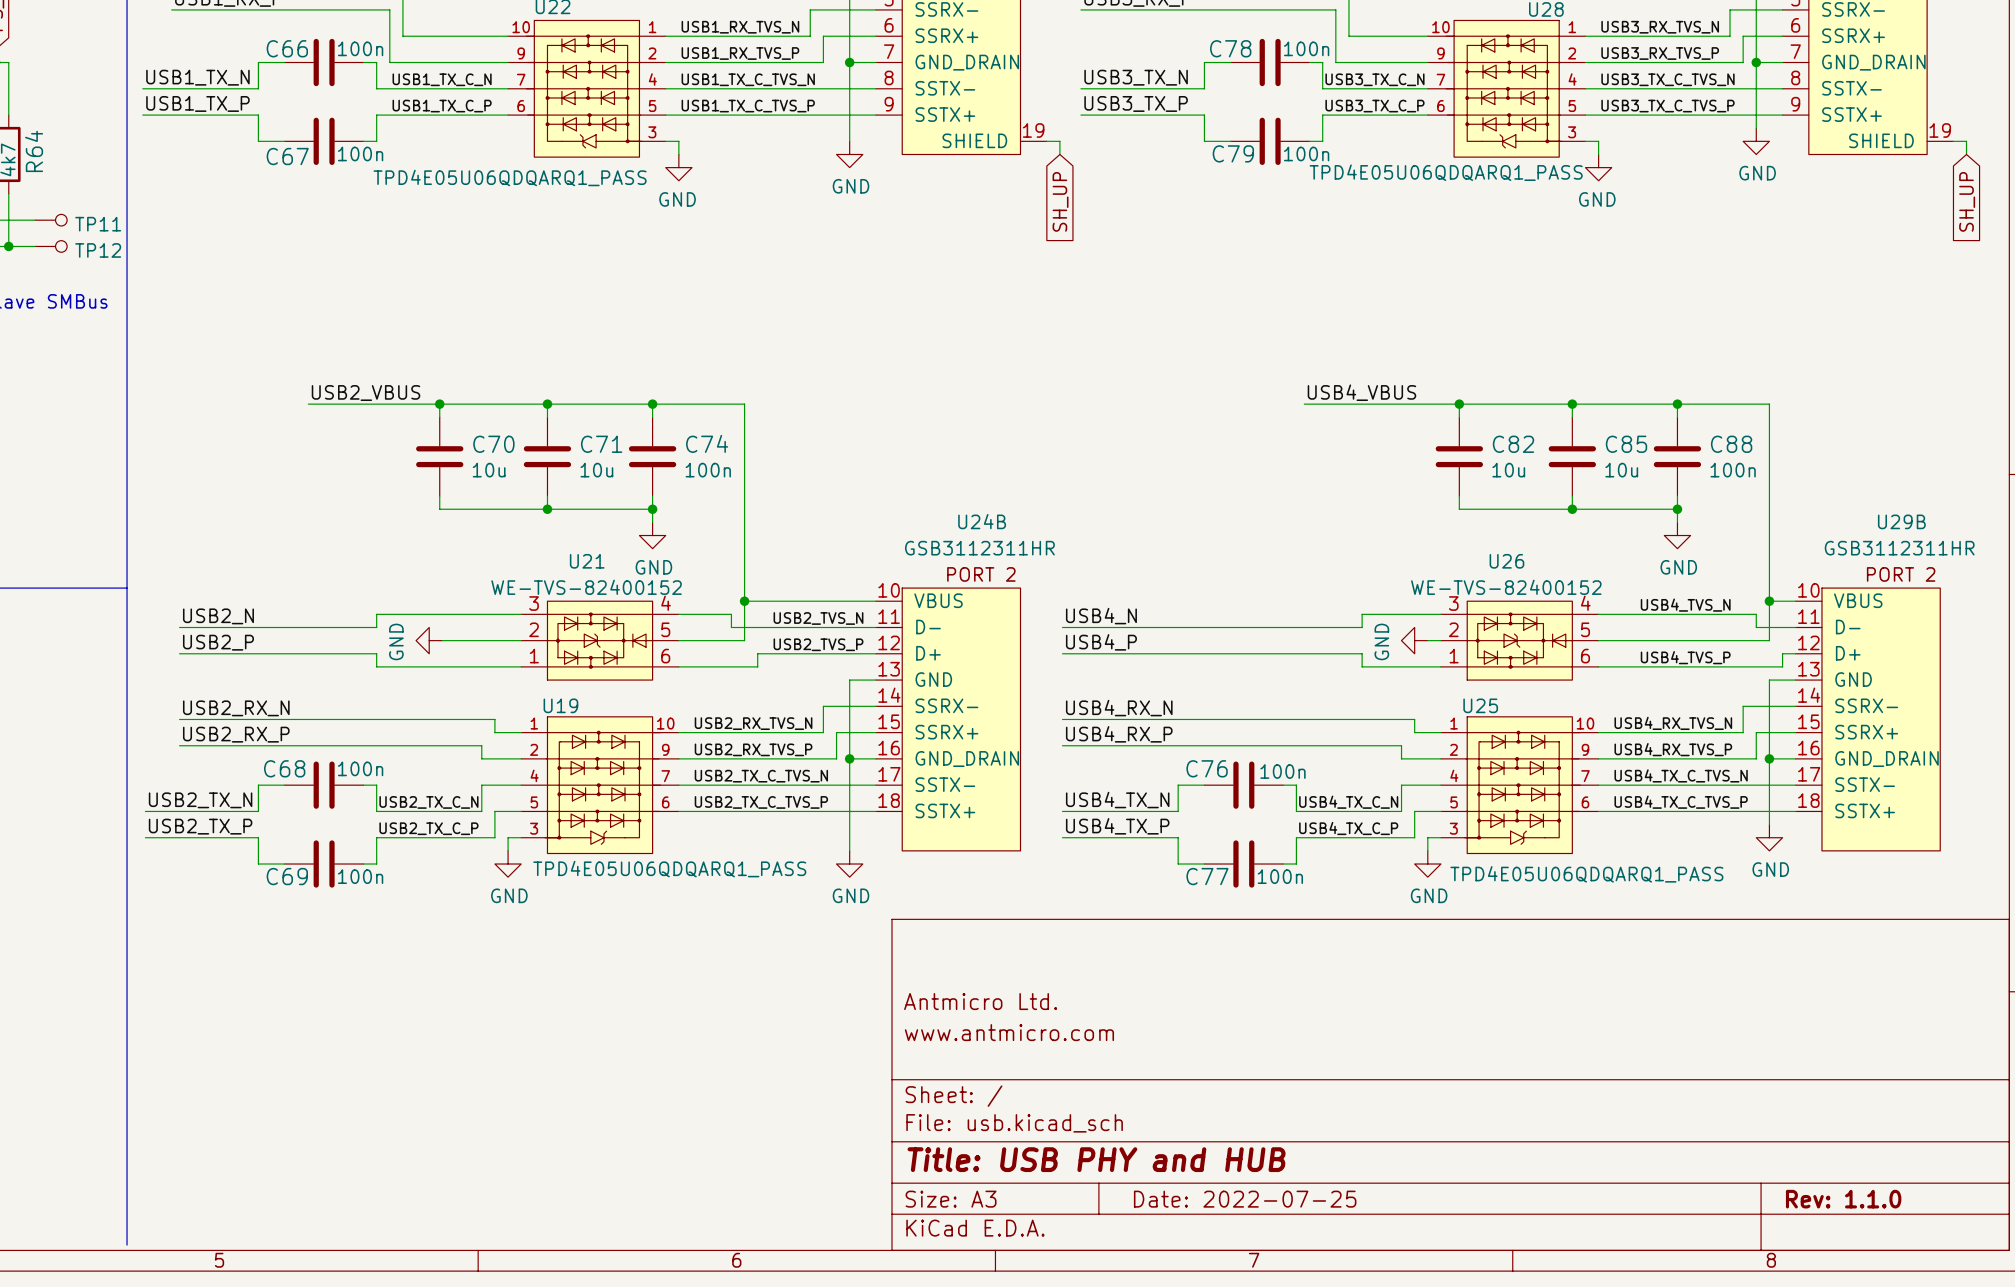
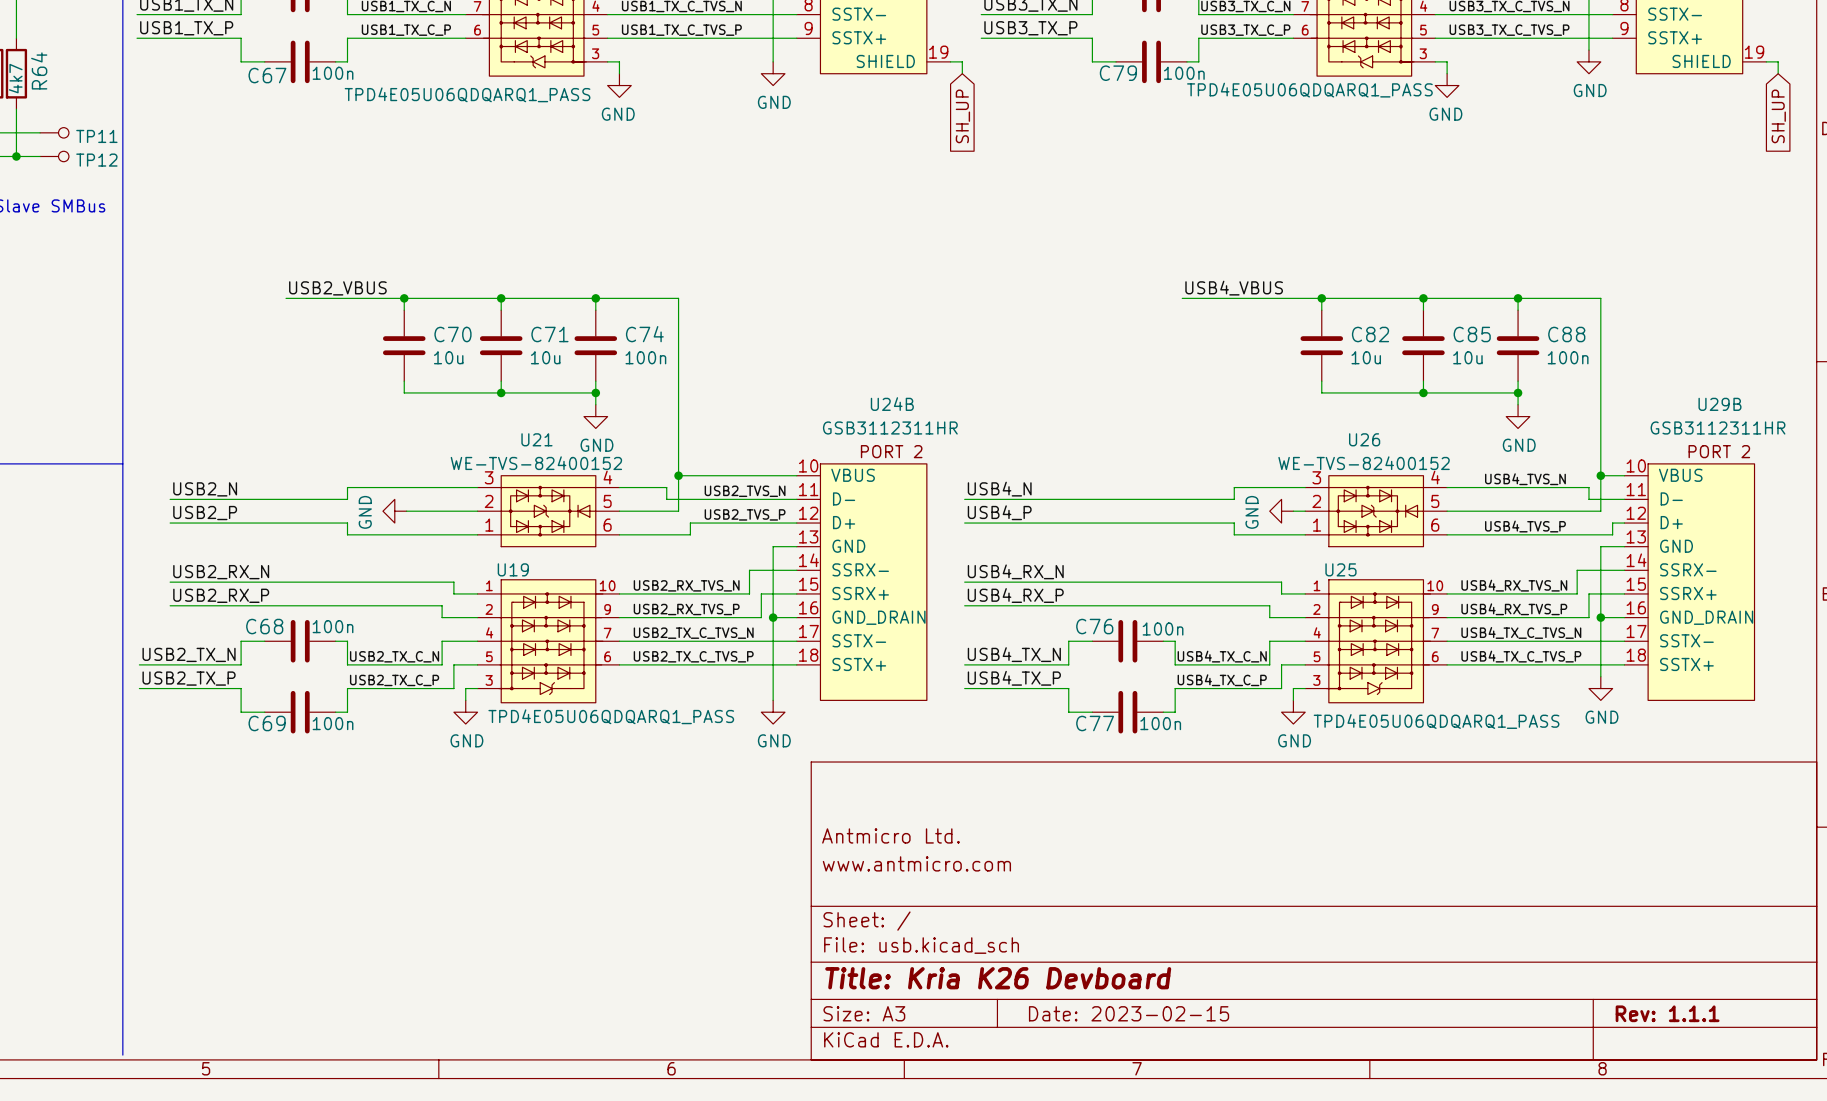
title block: Title: USB PHY and HUB (1096, 1159) -> Title: Kria K26 Devboard (998, 978)
title block: Date: 2022-07-25 (1245, 1199) -> Date: 2023-02-15 (1129, 1013)
title block: Rev: 1.1.0 (1843, 1199) -> Rev: 1.1.1 (1667, 1013)

